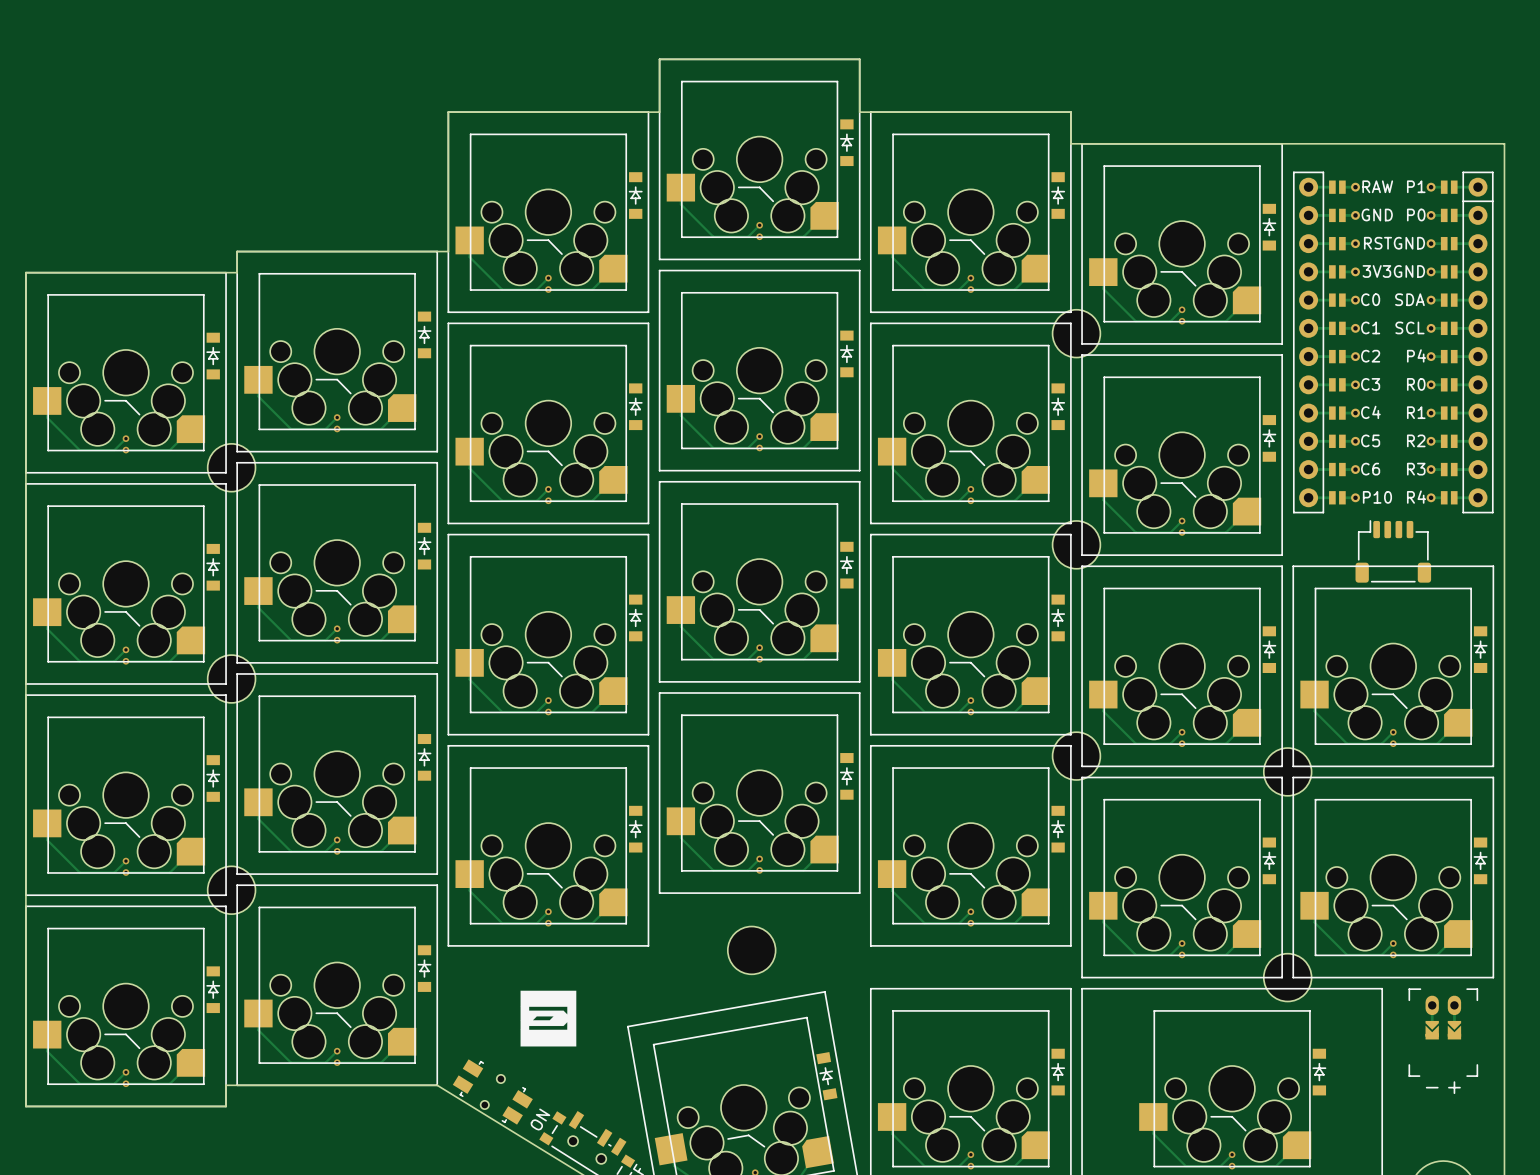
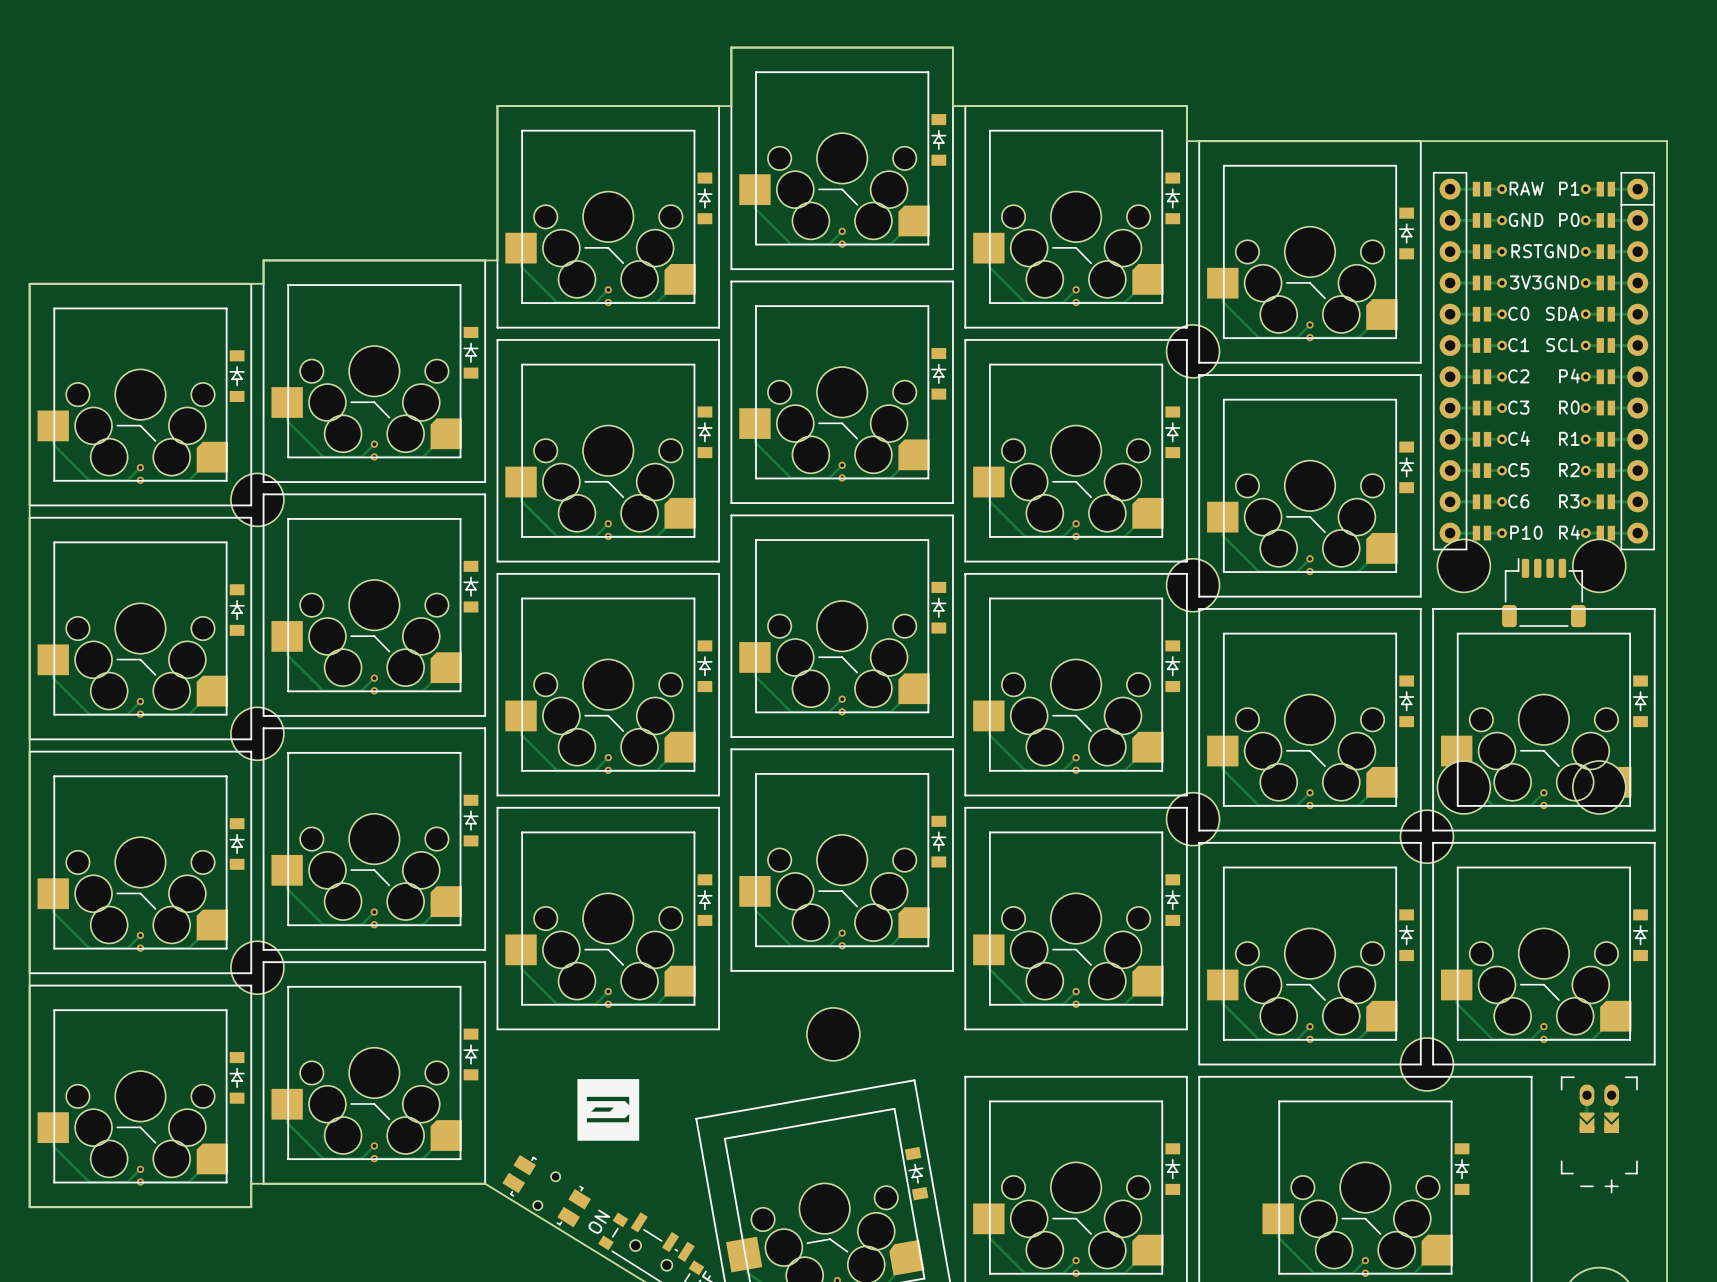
part: none -> (1463, 565)
part: none -> (1599, 565)
part: none -> (1463, 787)
part: none -> (1599, 787)

